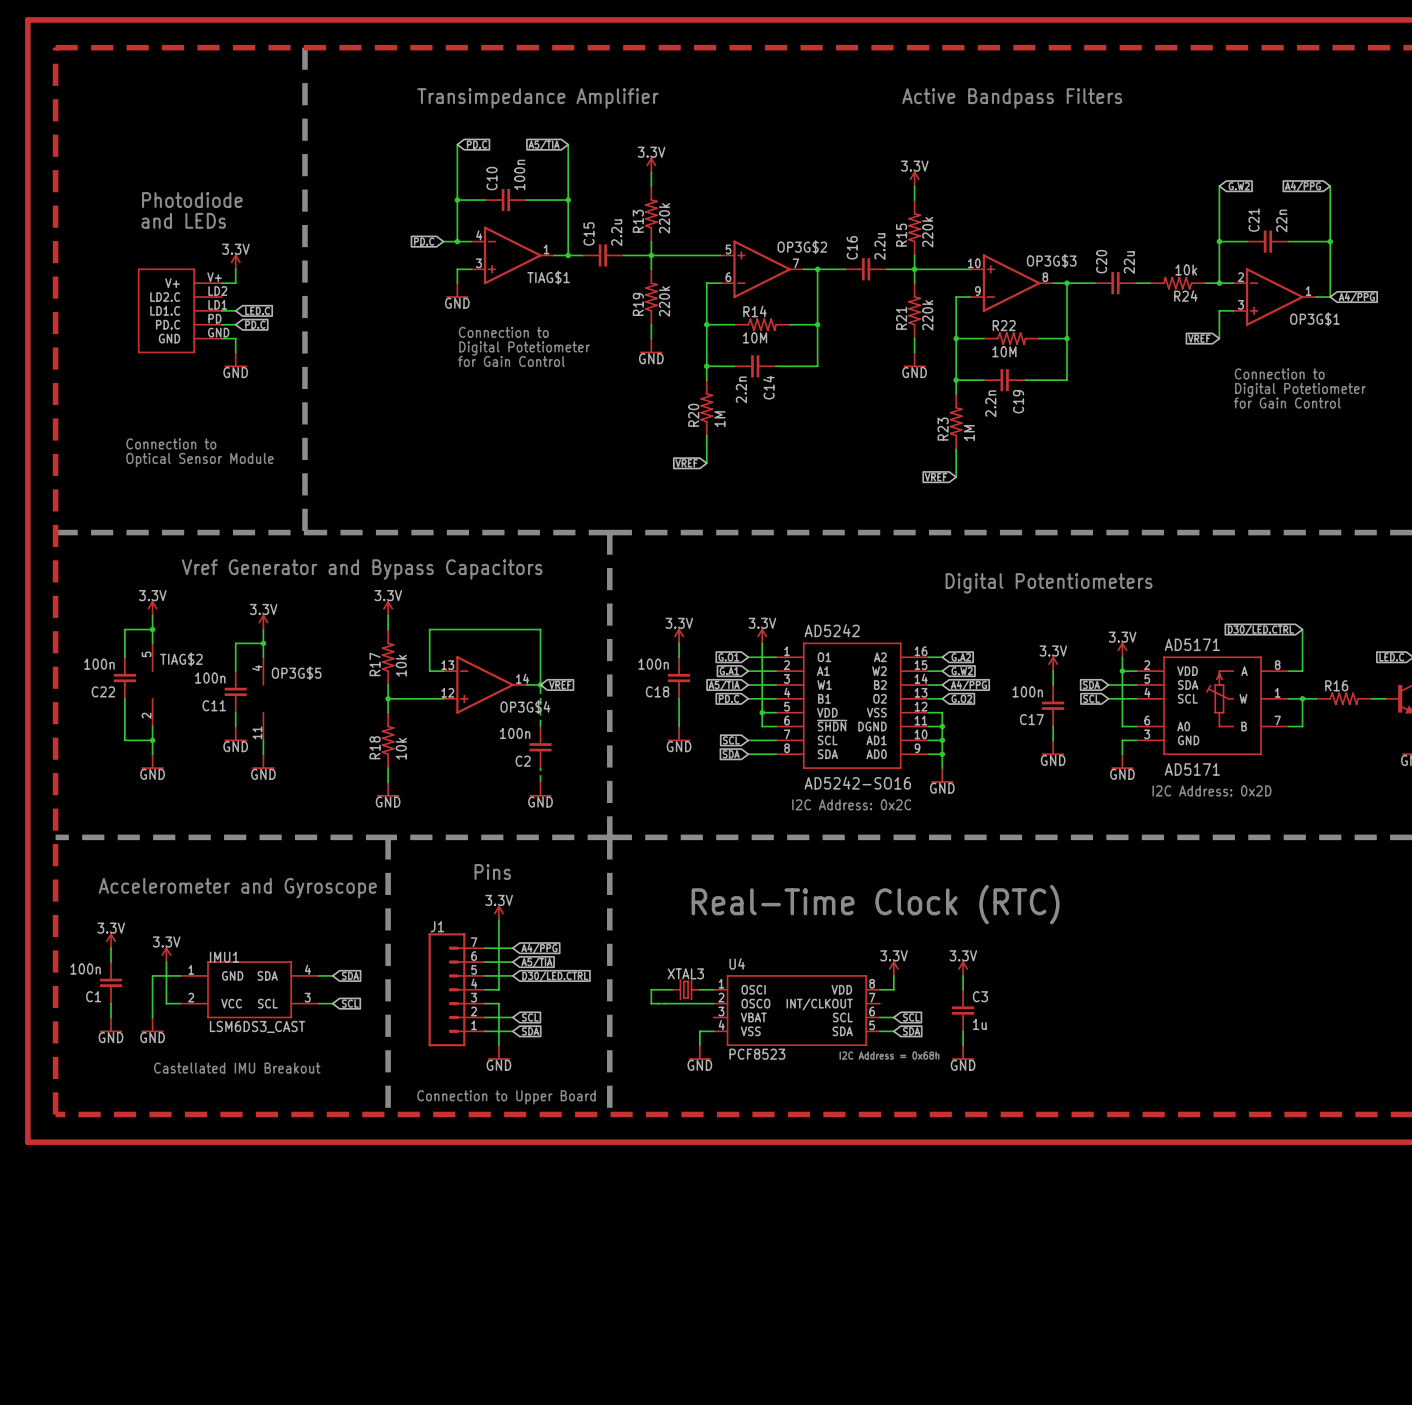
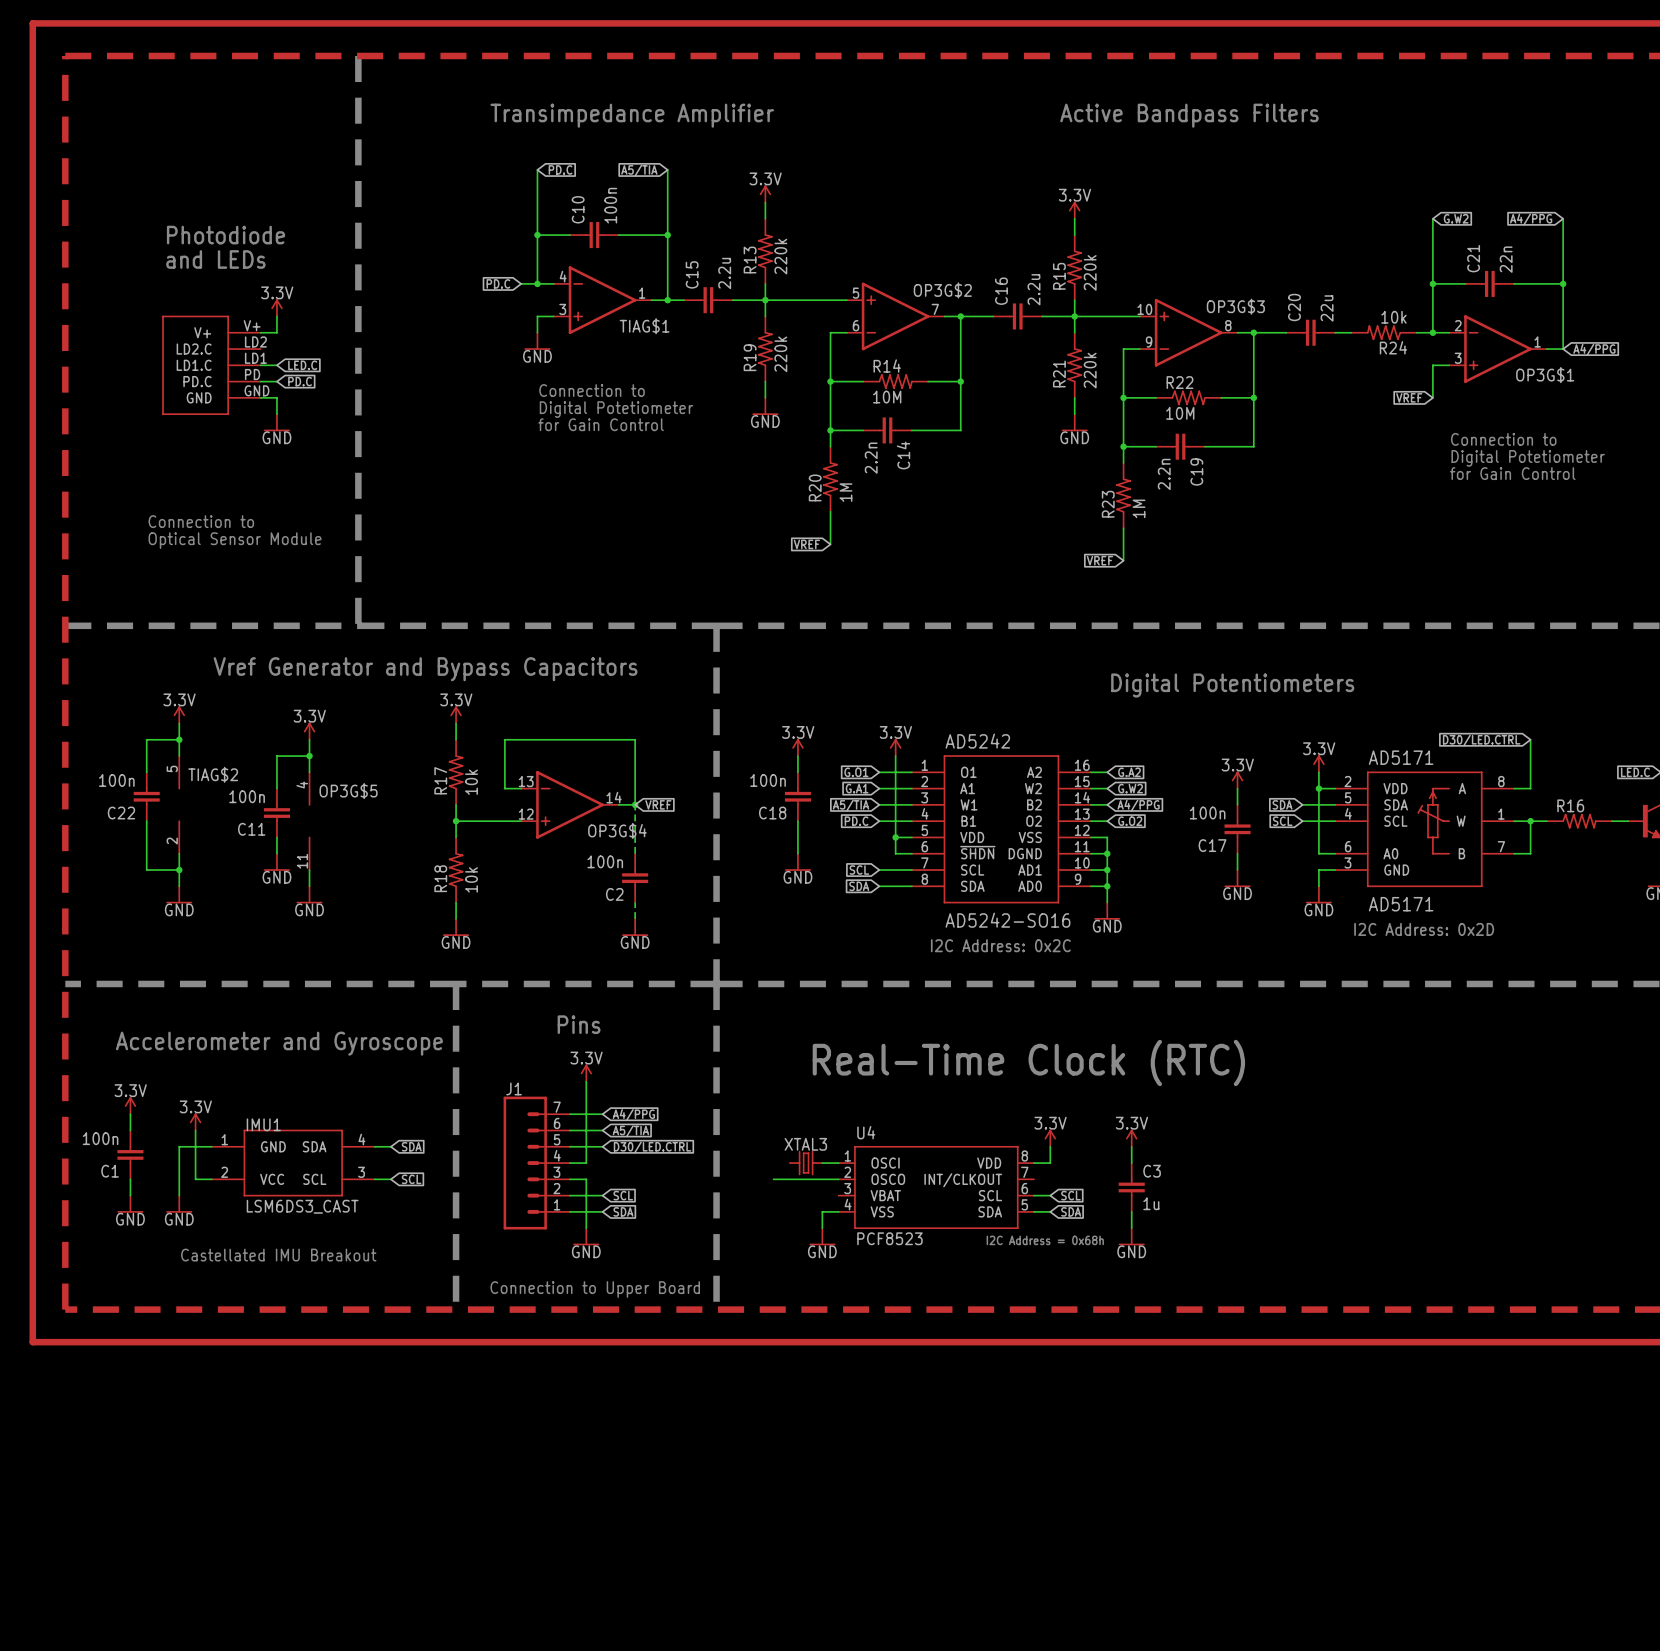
wire: (672, 989) (651, 989) (651, 1003) (658, 1003) -> none

